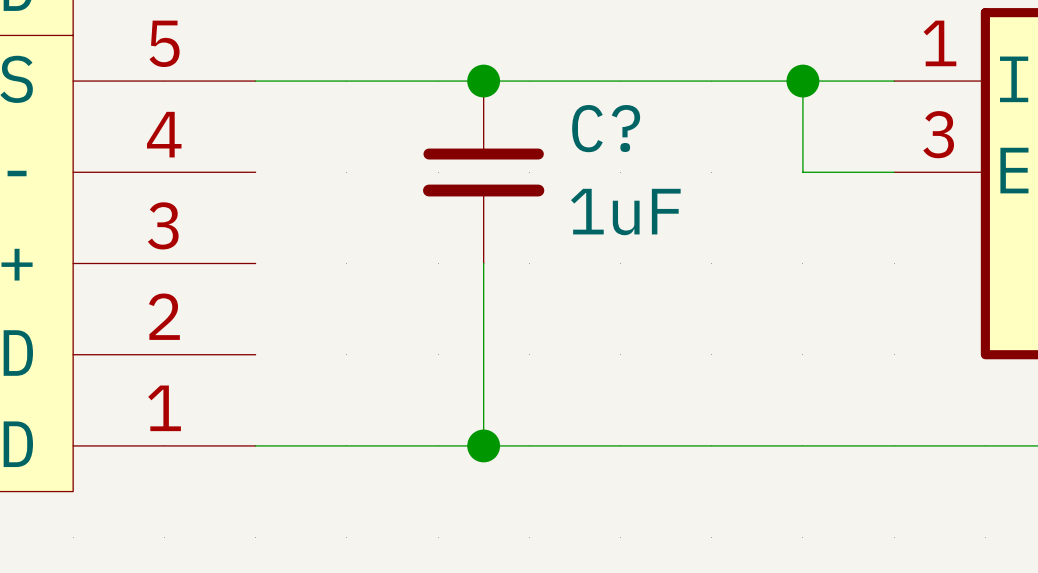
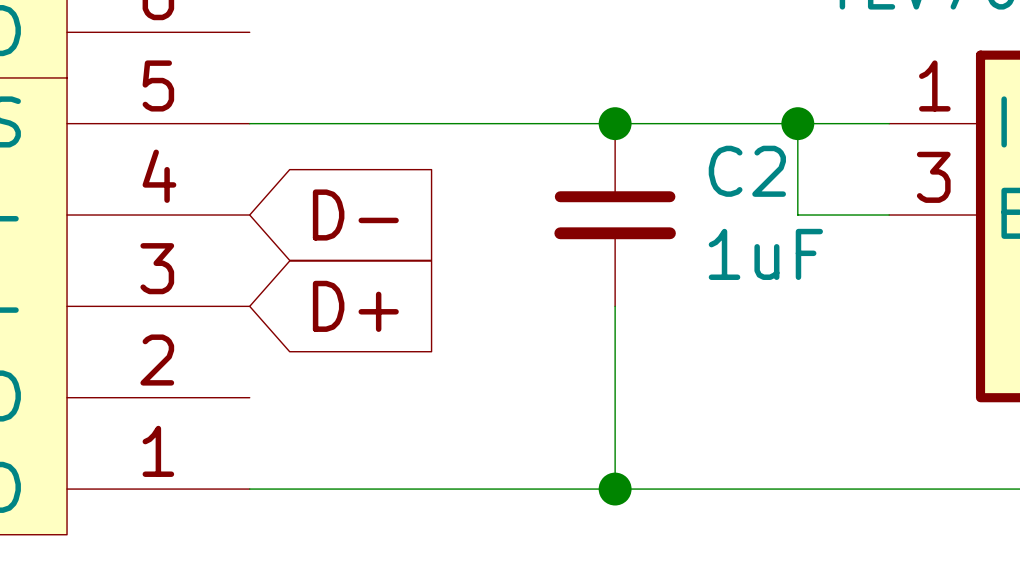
junction position: (483, 81) -> (615, 123)
global label: none -> D- (355, 215)
C?: 1uF (483, 172) -> none
C2: none -> 1uF (615, 215)
global label: none -> D+ (355, 306)
wire: (483, 263) (483, 445) -> (615, 306) (615, 489)
junction position: (483, 445) -> (615, 489)

